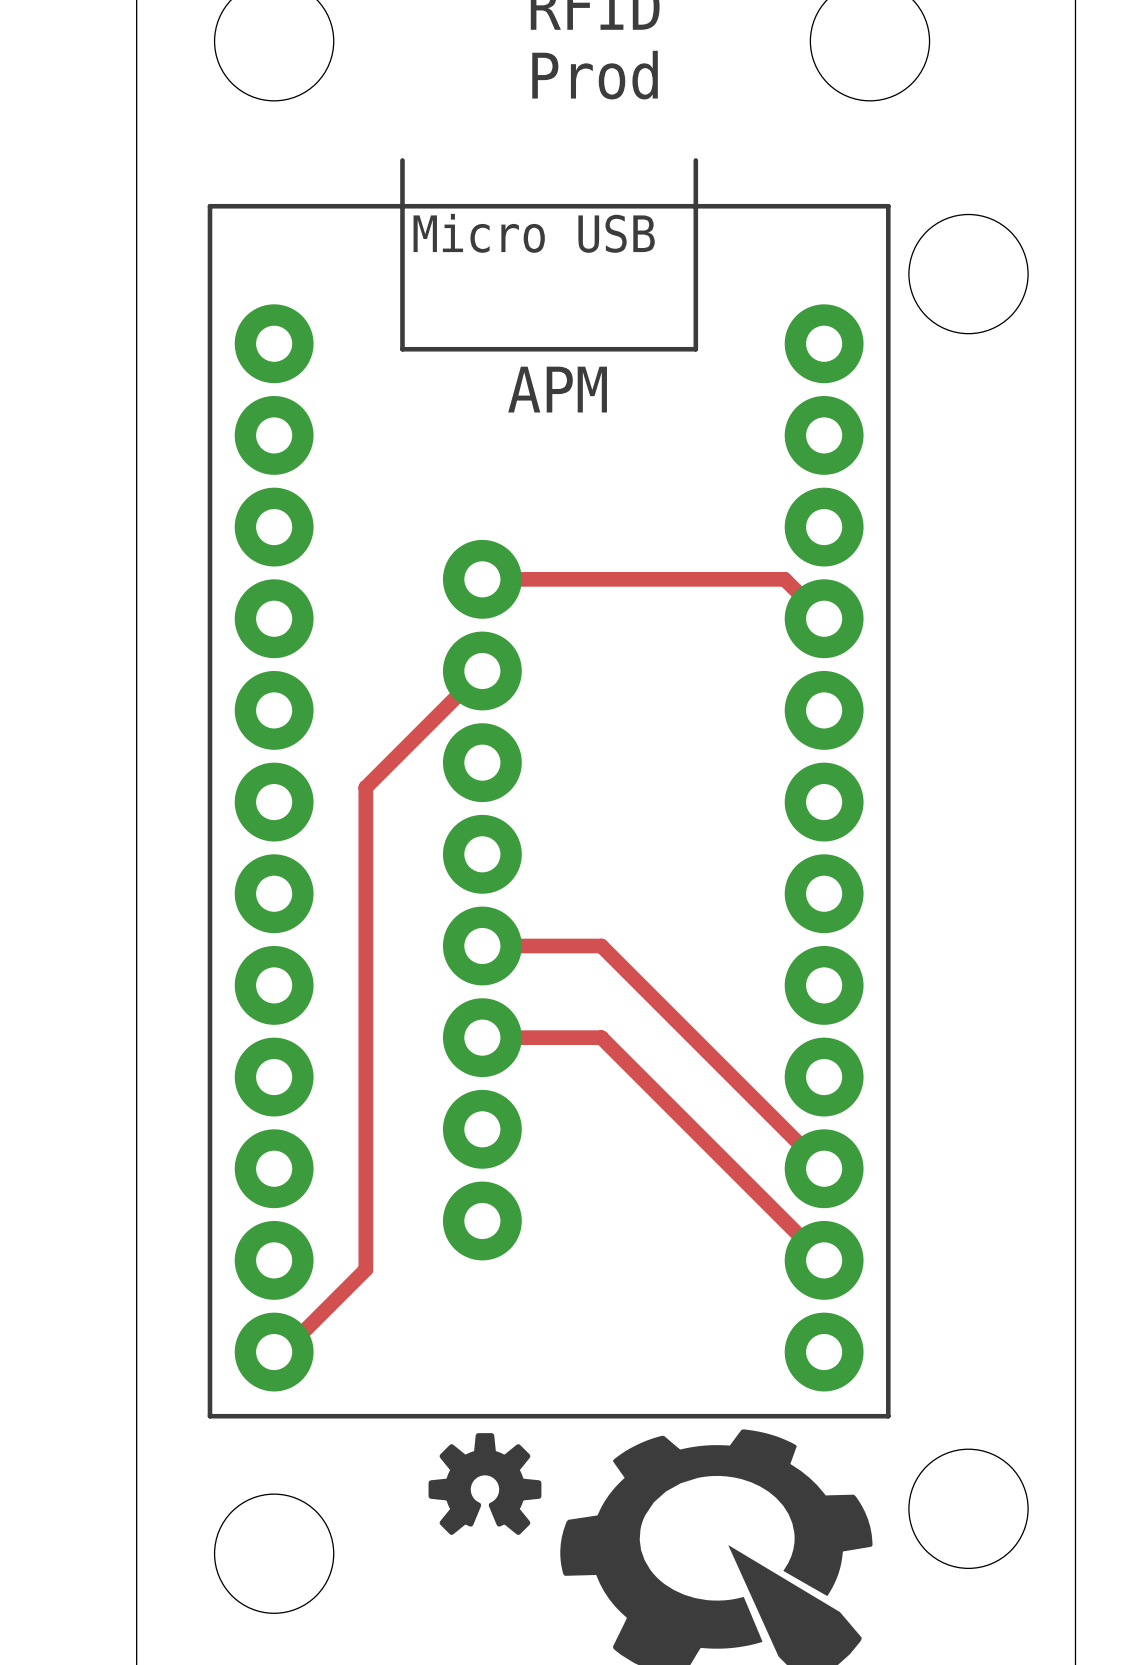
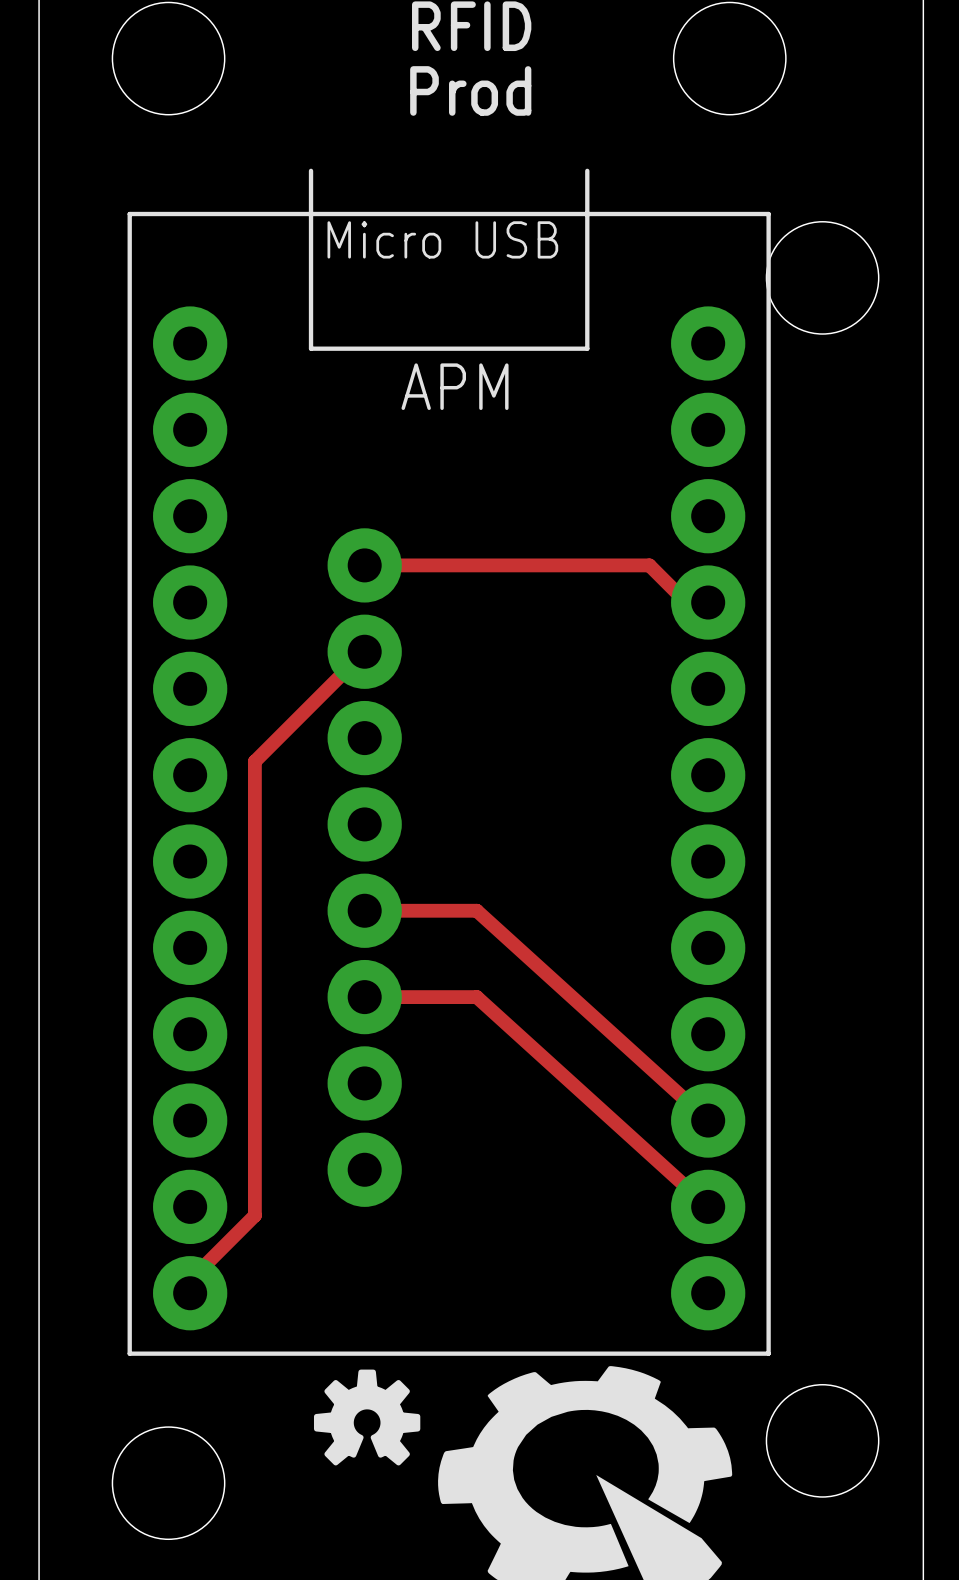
APM position: (549, 788) -> (449, 762)
track: (601, 945) (824, 1168) -> (476, 910) (708, 1120)
track: (601, 1037) (824, 1260) -> (476, 997) (708, 1206)

